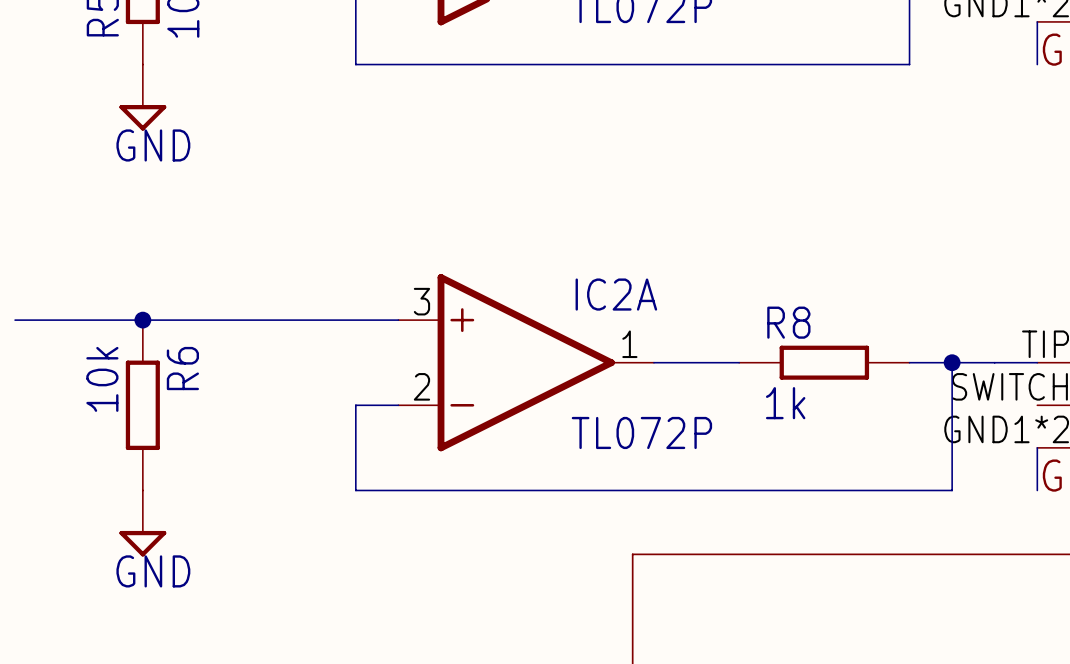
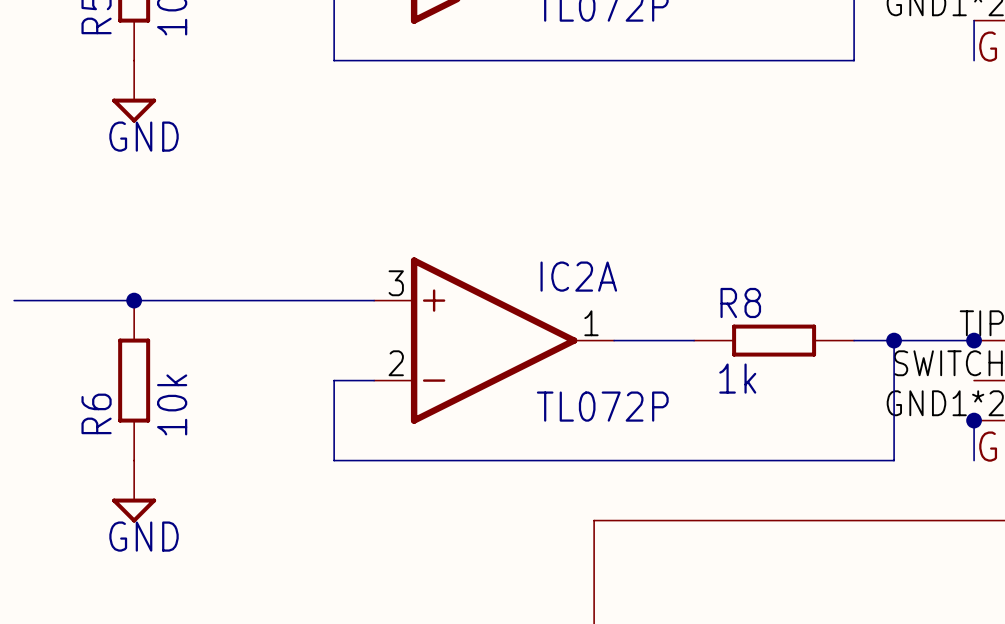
junction: none -> (974, 340)
R6 name position: R6 (182, 368) -> R6 (96, 413)
R6 value position: 10k (102, 379) -> 10k (172, 404)
junction: none -> (974, 420)

